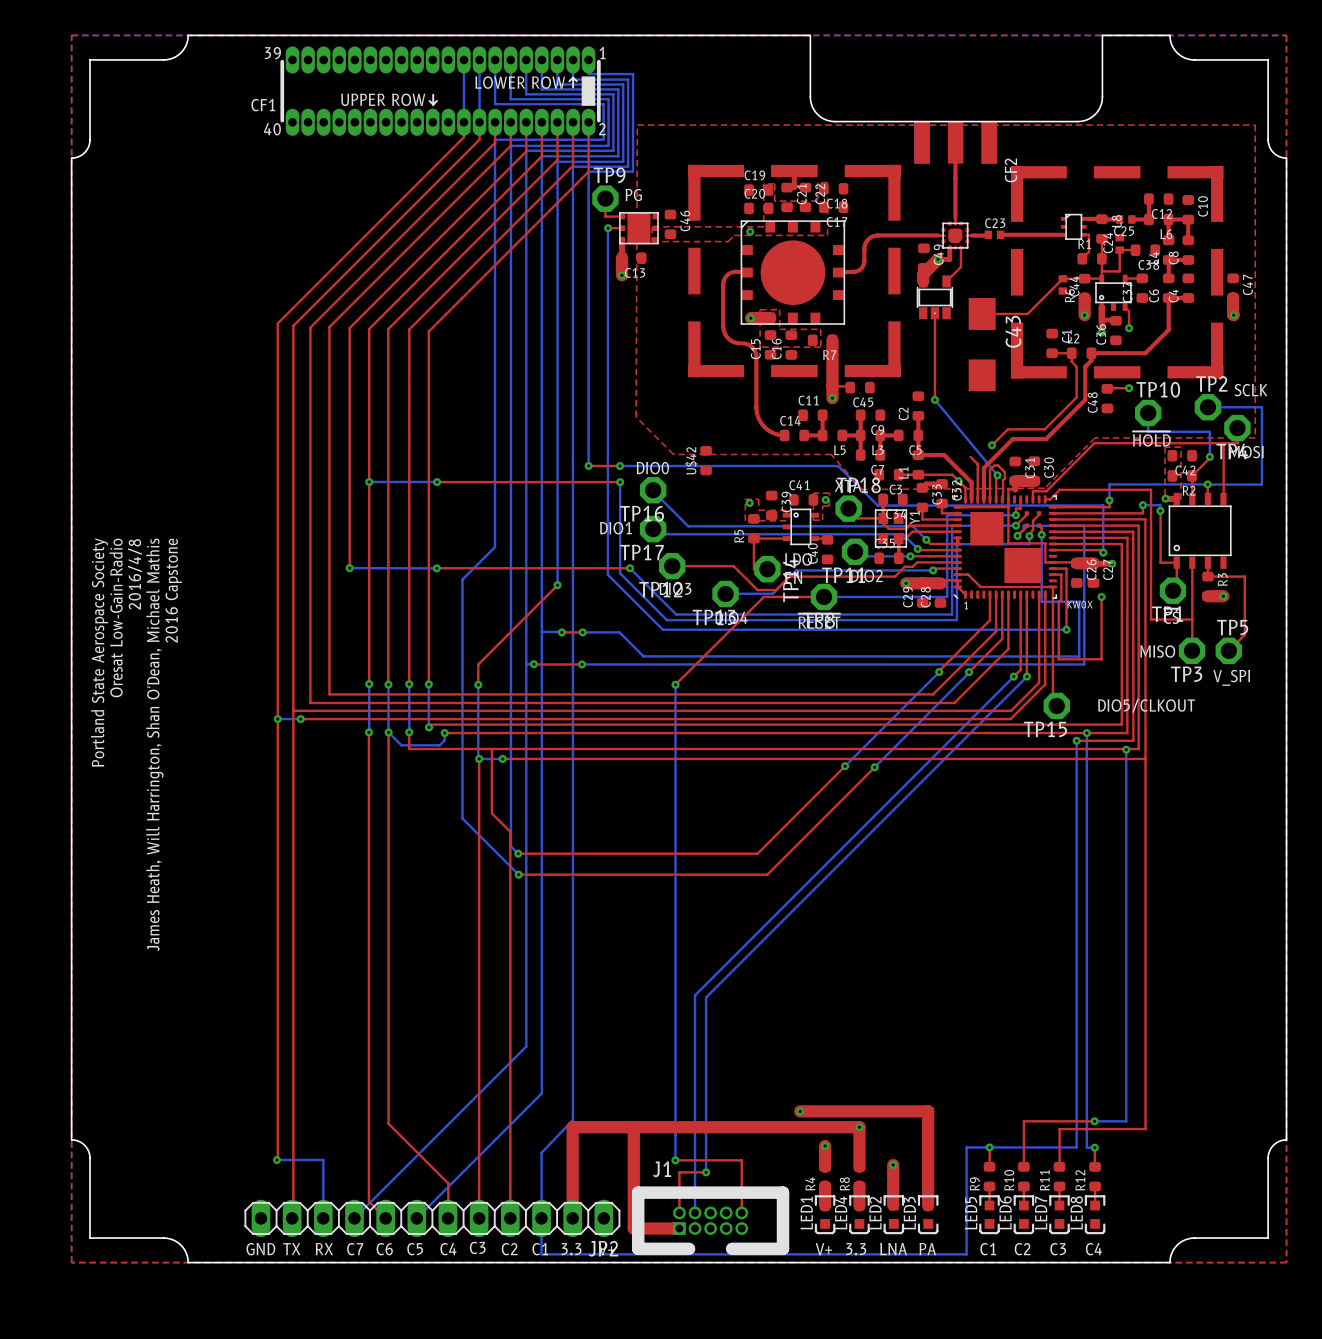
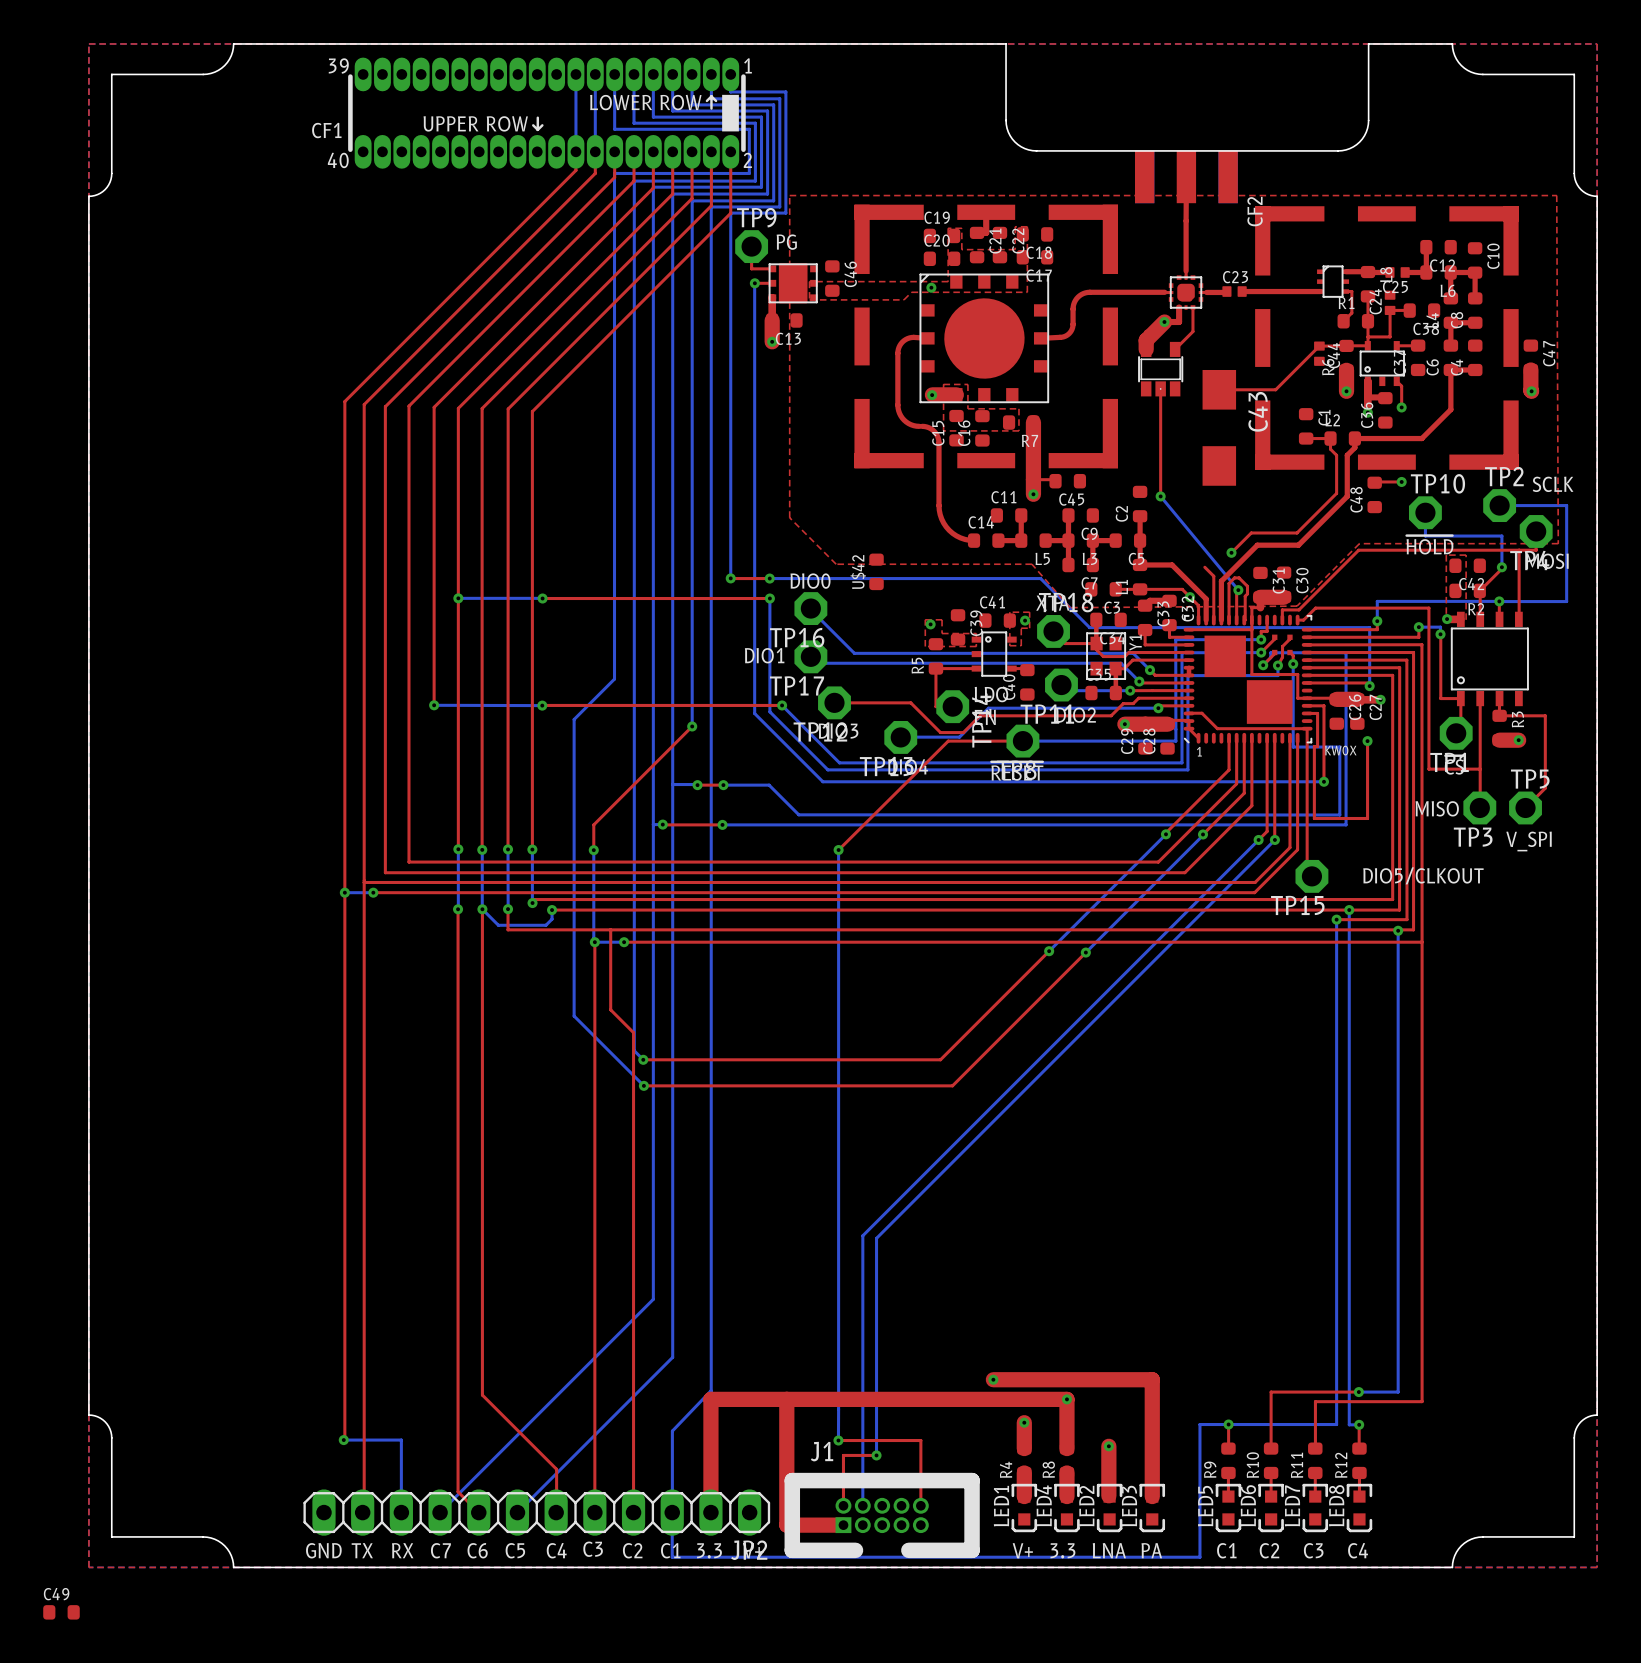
C49 rotation: 0° (923, 258) -> 90° clockwise (61, 1612)
C49 position: (923, 258) -> (61, 1612)
top zone outline: (636, 417) (637, 125) (1255, 125) (1255, 437) -> (789, 517) (789, 195) (1556, 195) (1558, 543)
text: 2016/4/8 (134, 574) -> none
text: 2016 Capstone (173, 590) -> none
text: Oresat Low-Gain-Radio (116, 617) -> none
text: Portland State Aerospace Society (99, 652) -> none
text: James Heath, Will Harrington, Shan O'Dean, Michael Mathis (154, 744) -> none

